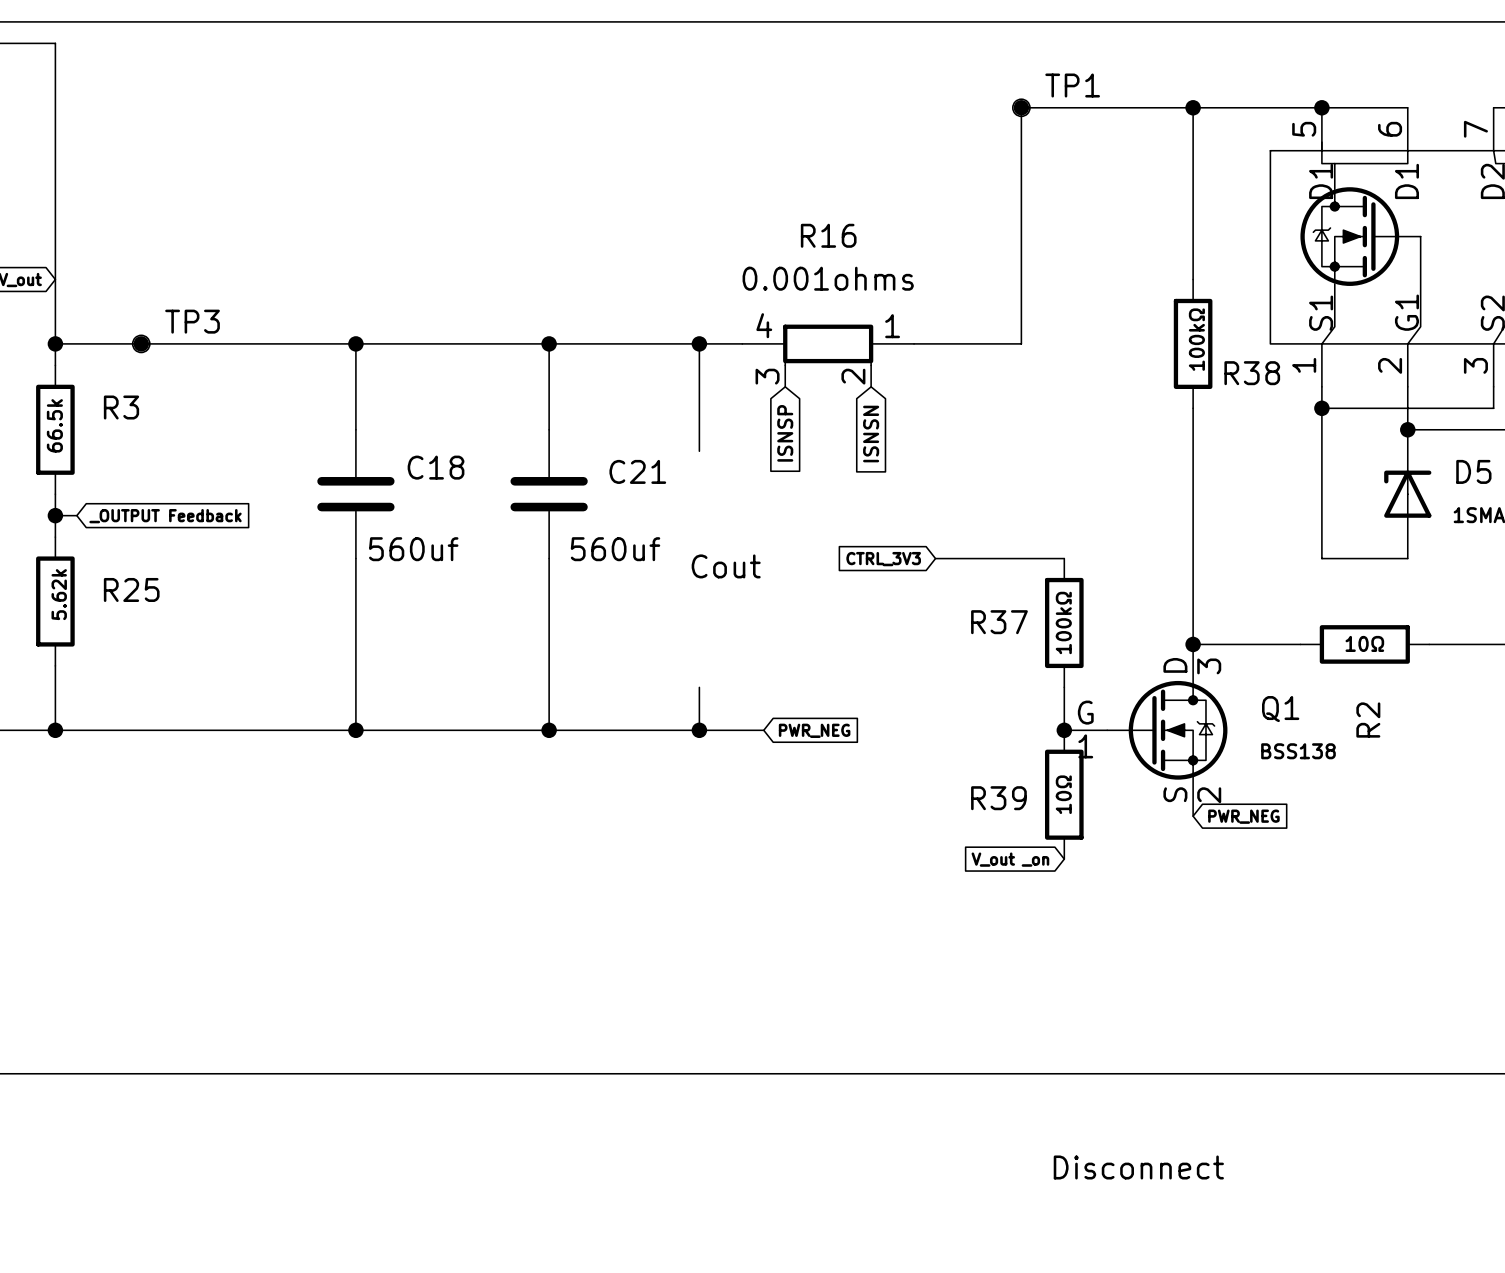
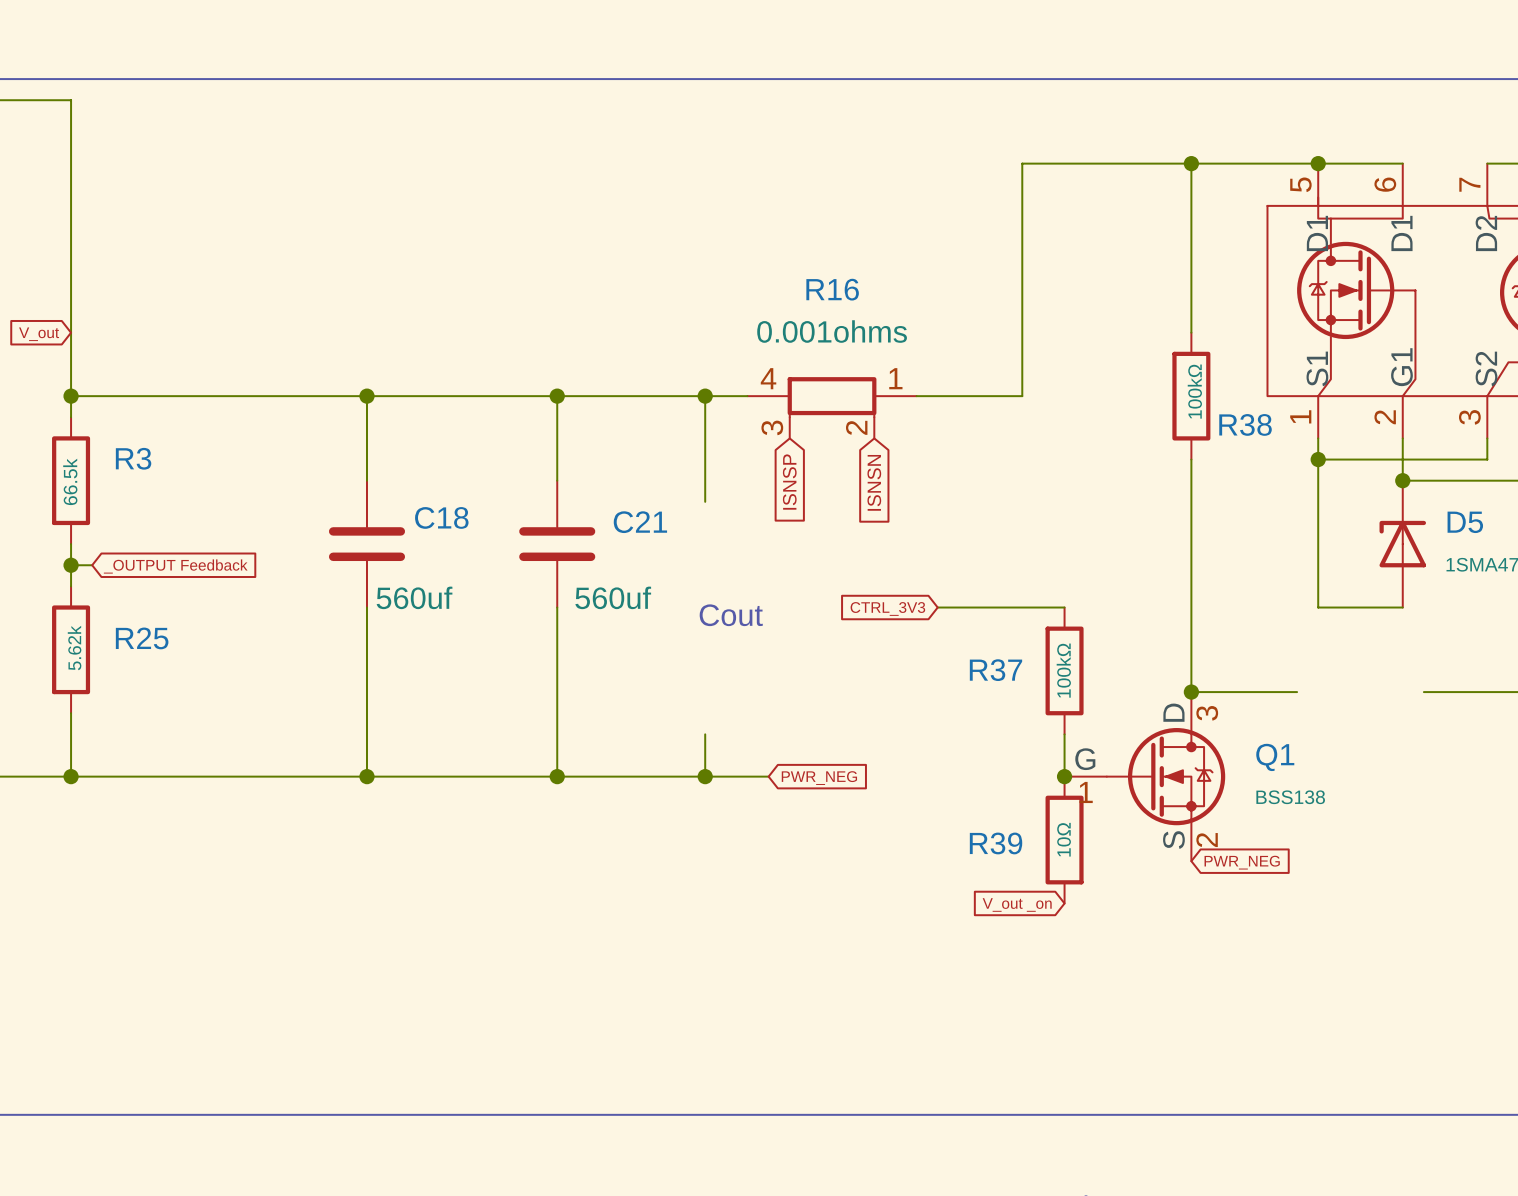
junction: (1021, 107) -> none
TP1: (1021, 107) -> none
junction: (141, 343) -> none
TP3: (141, 343) -> none
R2: 10Ω (1364, 644) -> none

